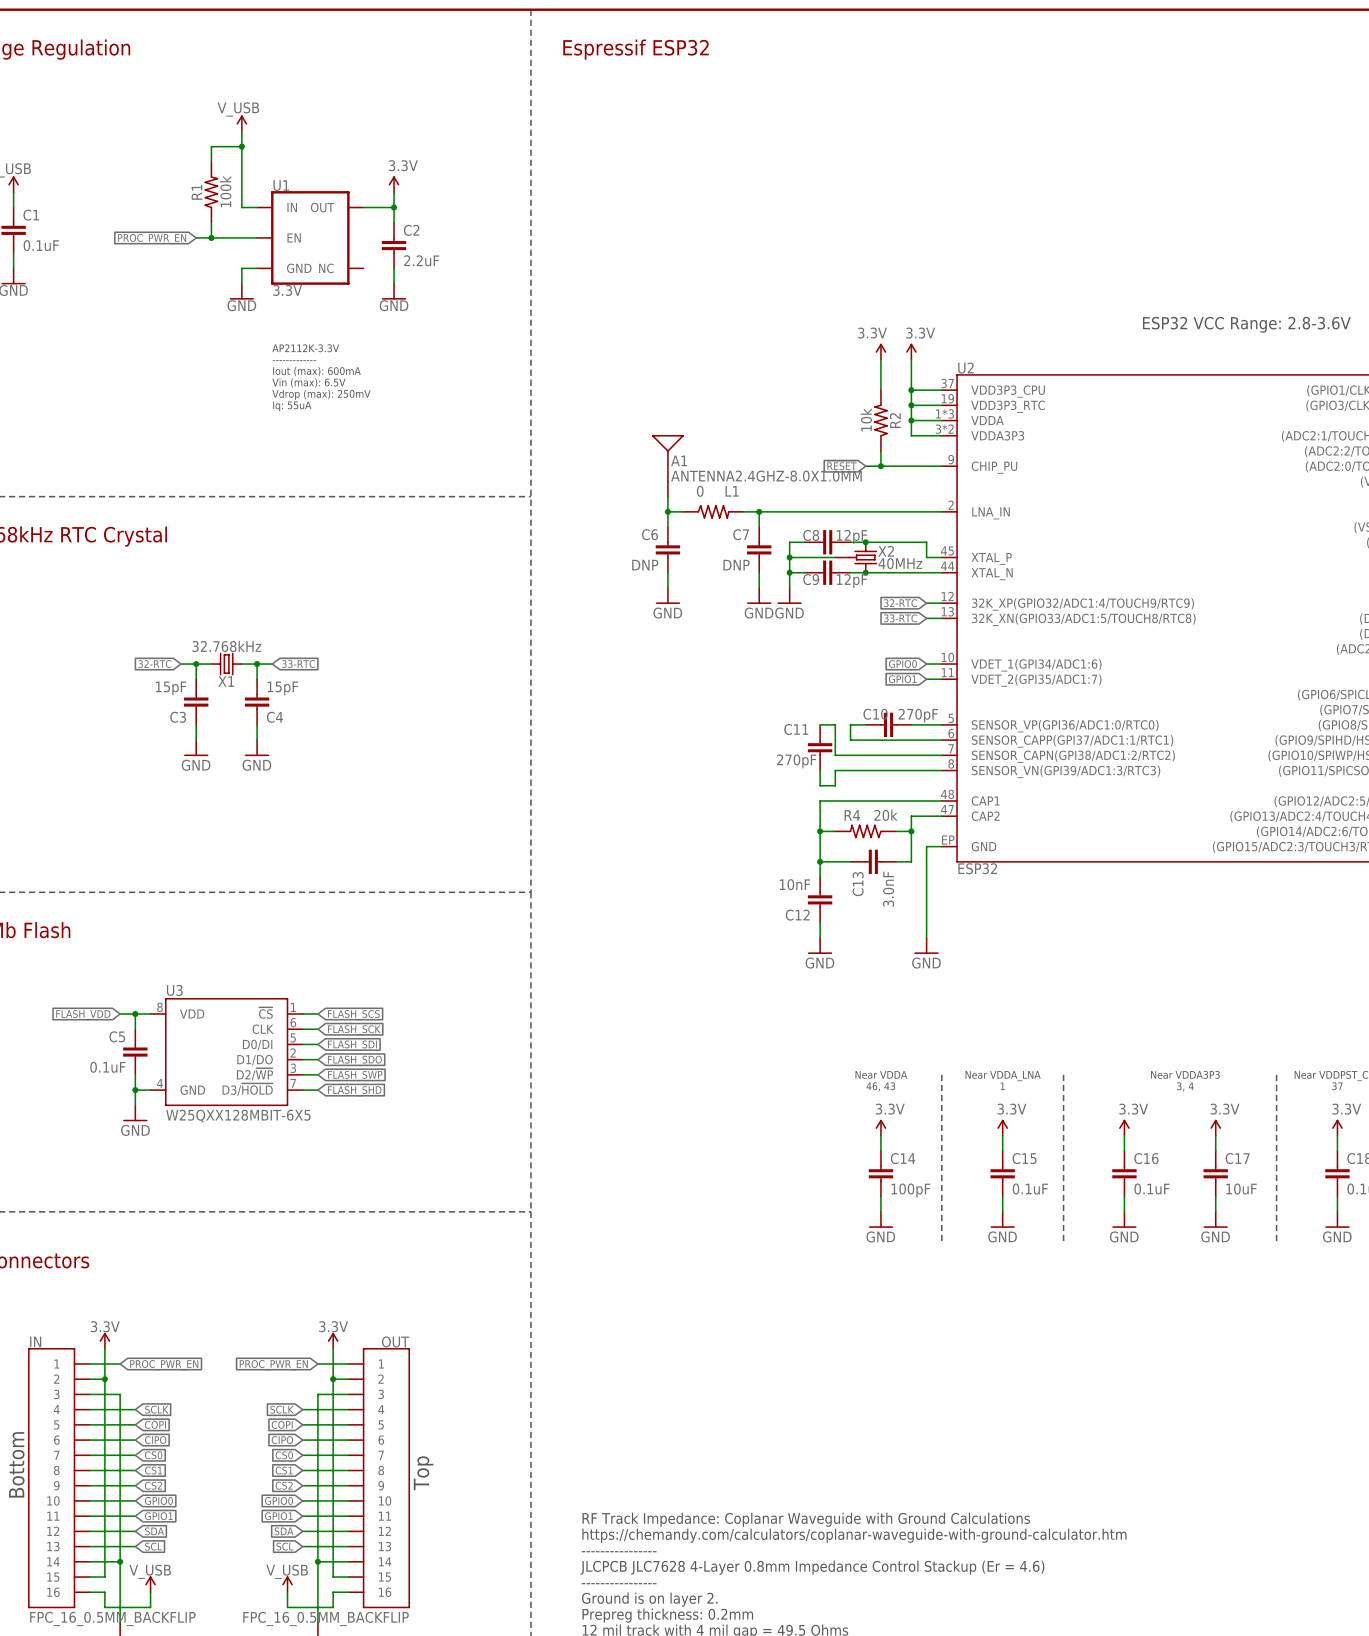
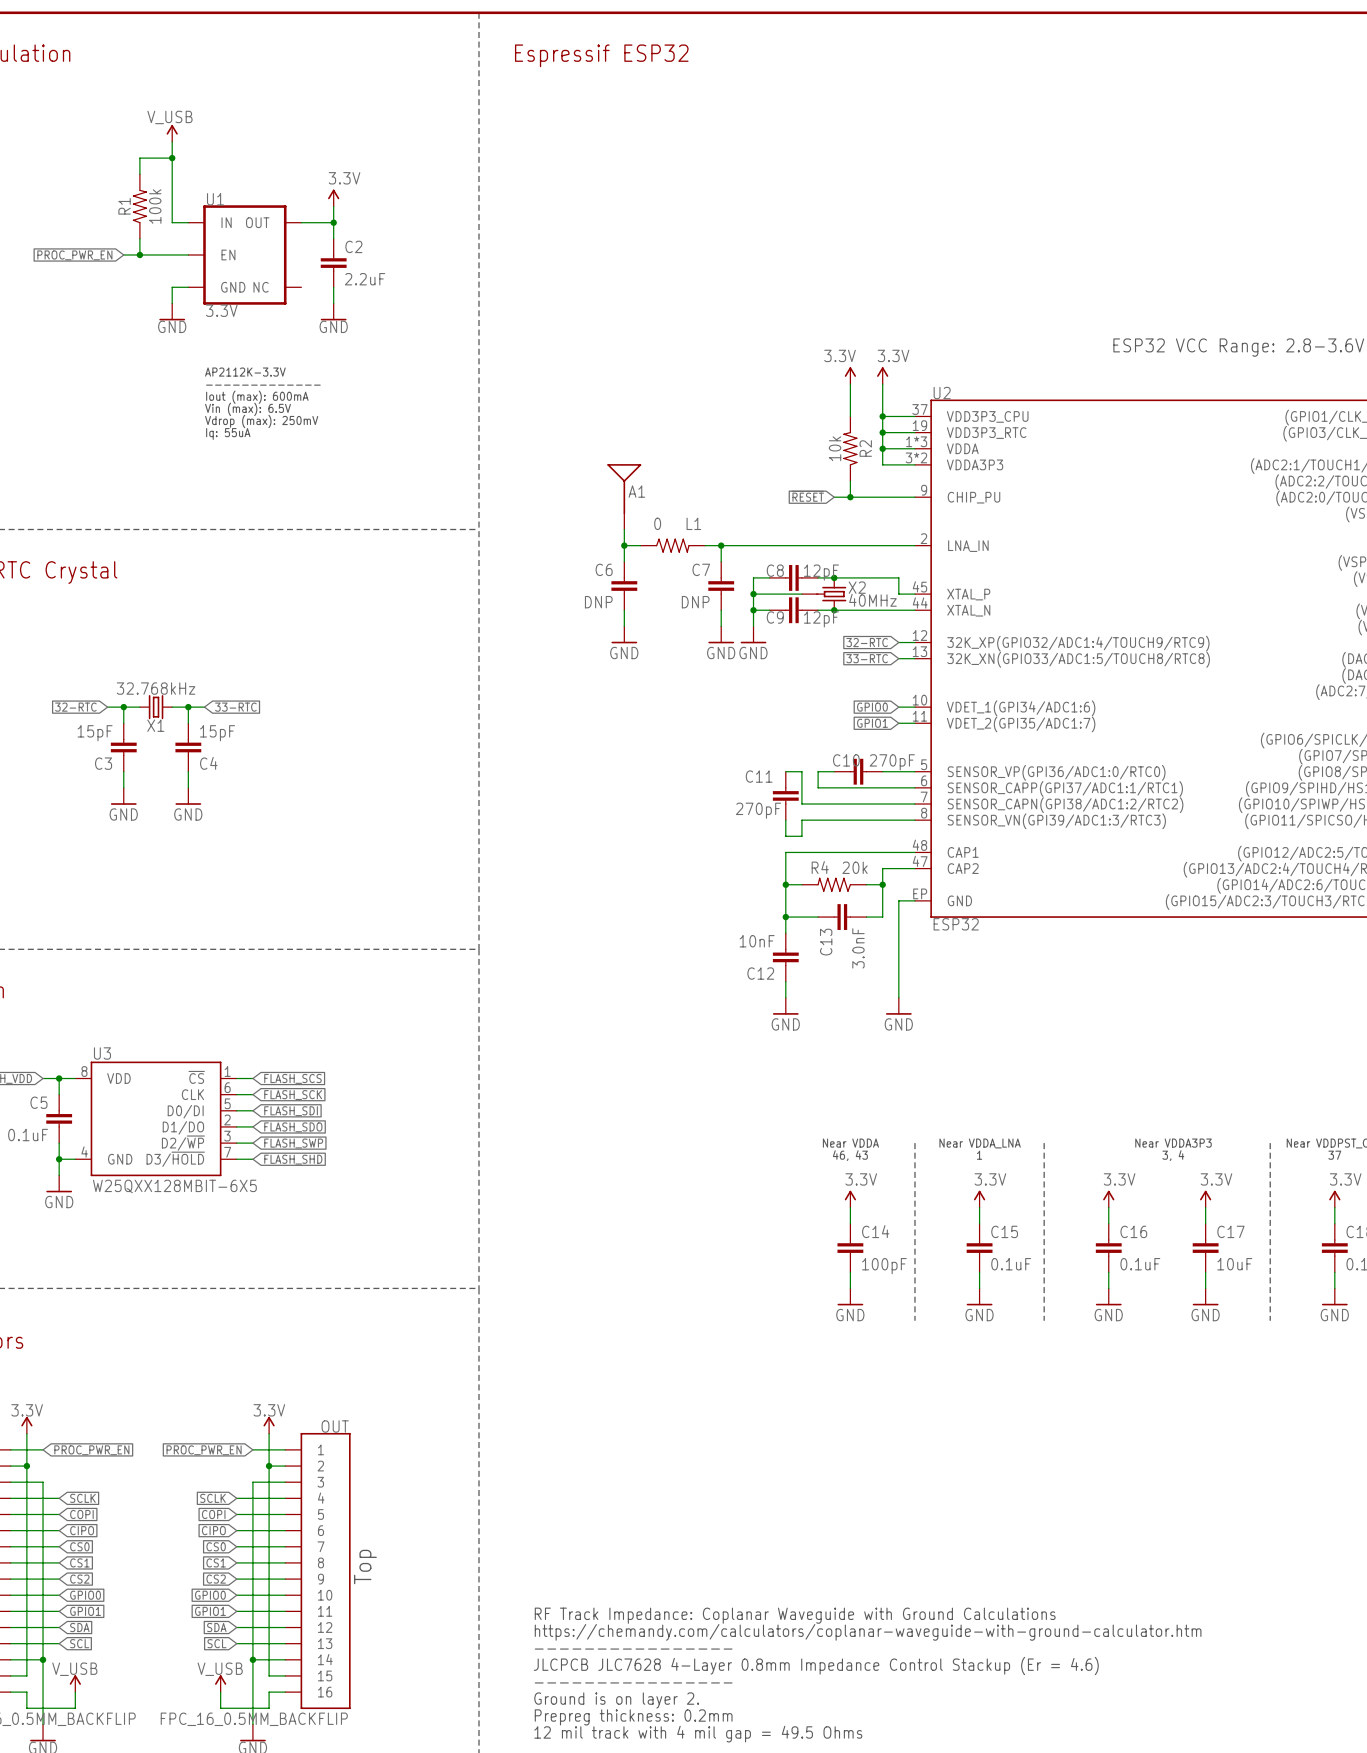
A1 value: ANTENNA2.4GHZ-8.0X1.0MM (766, 476) -> none

